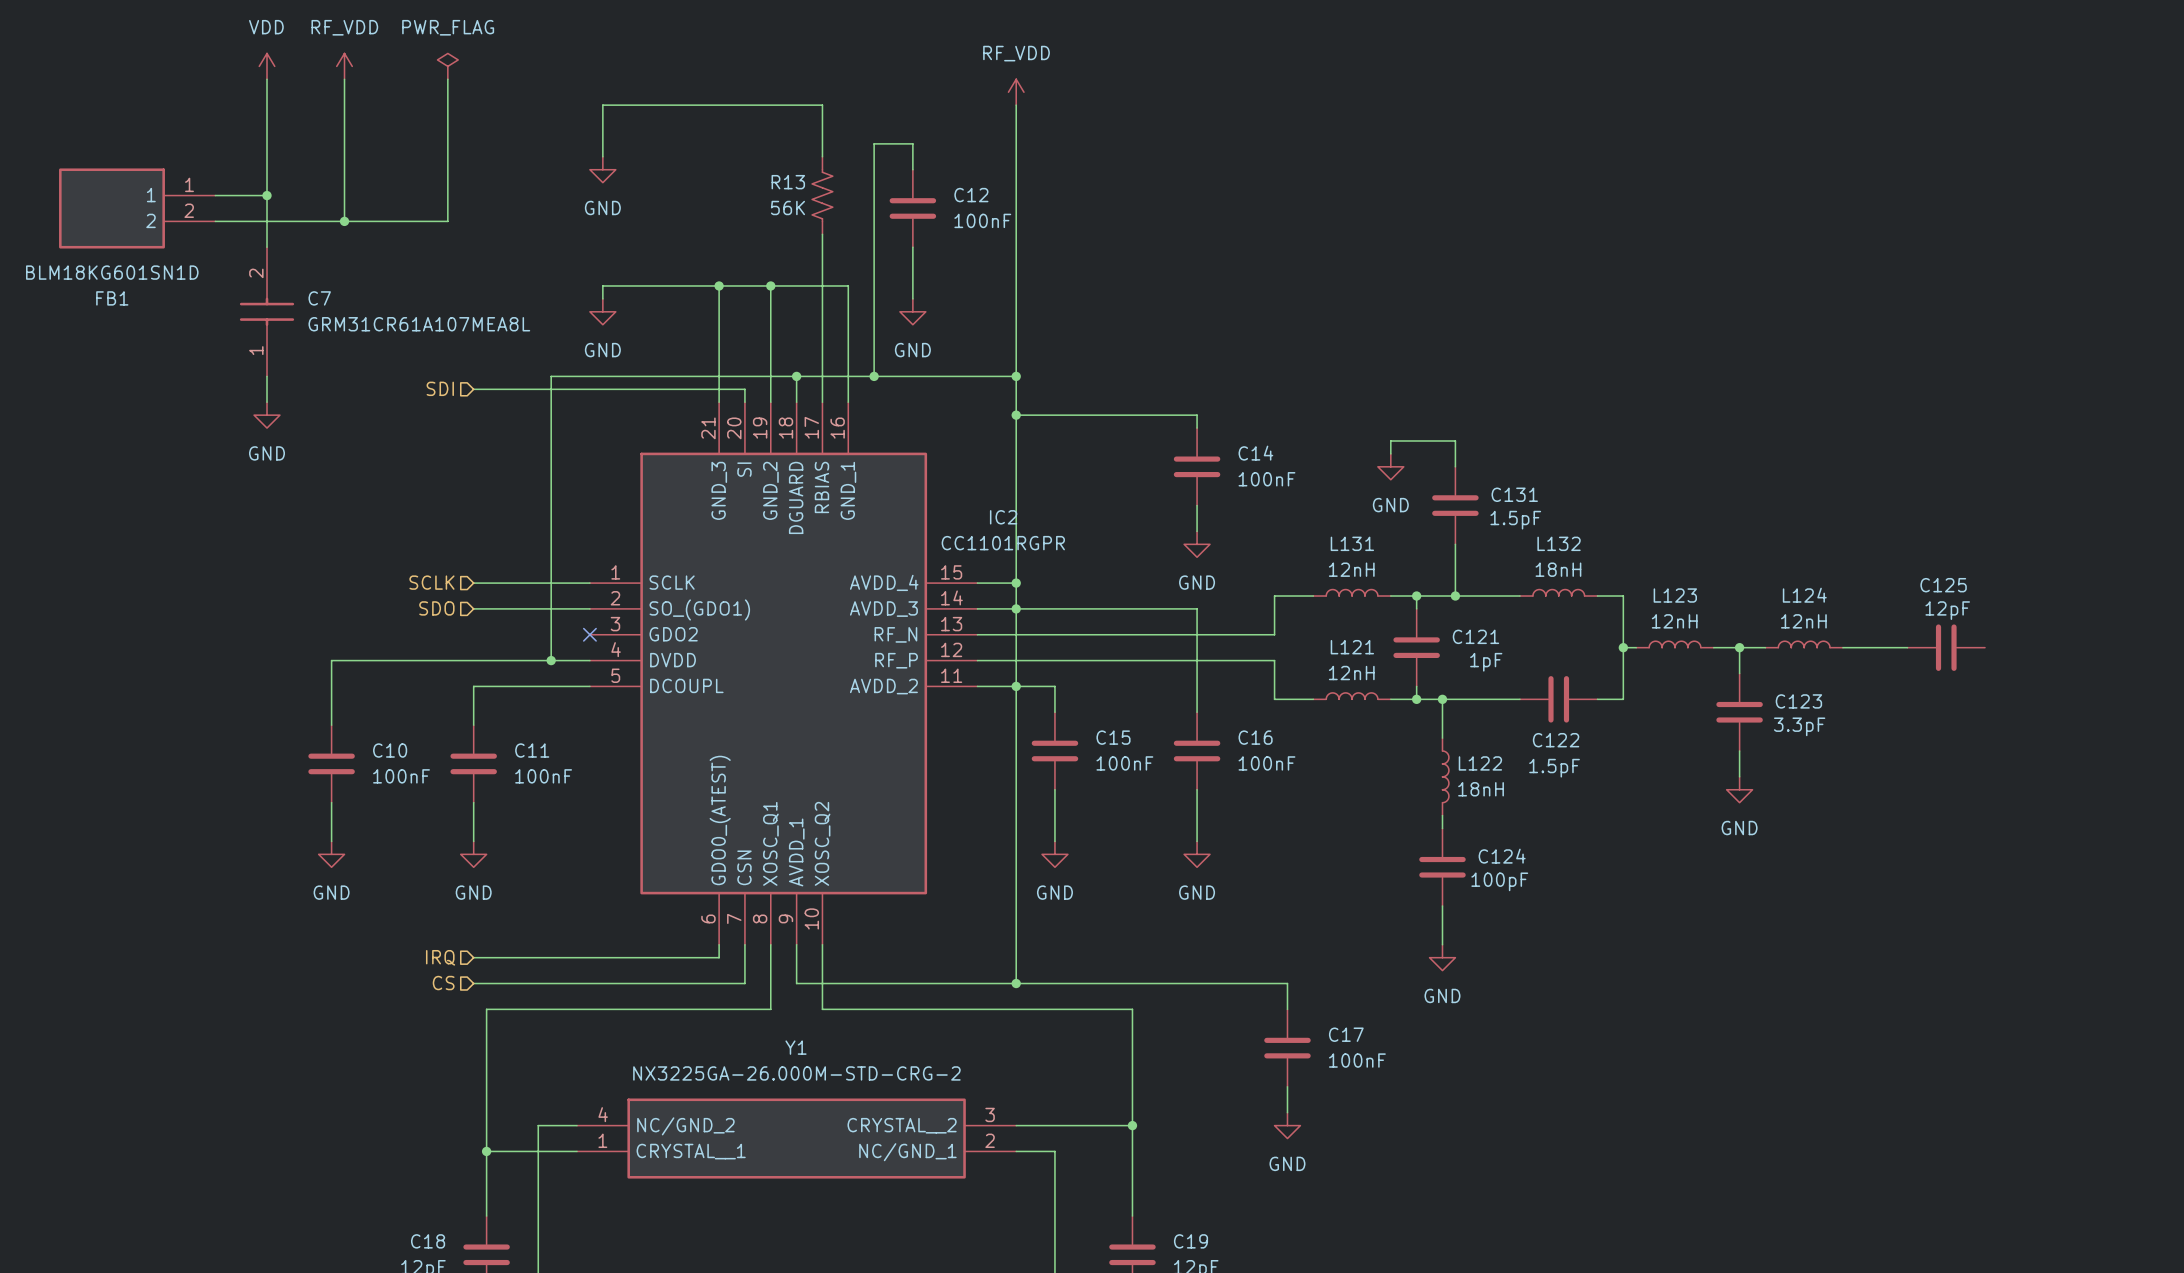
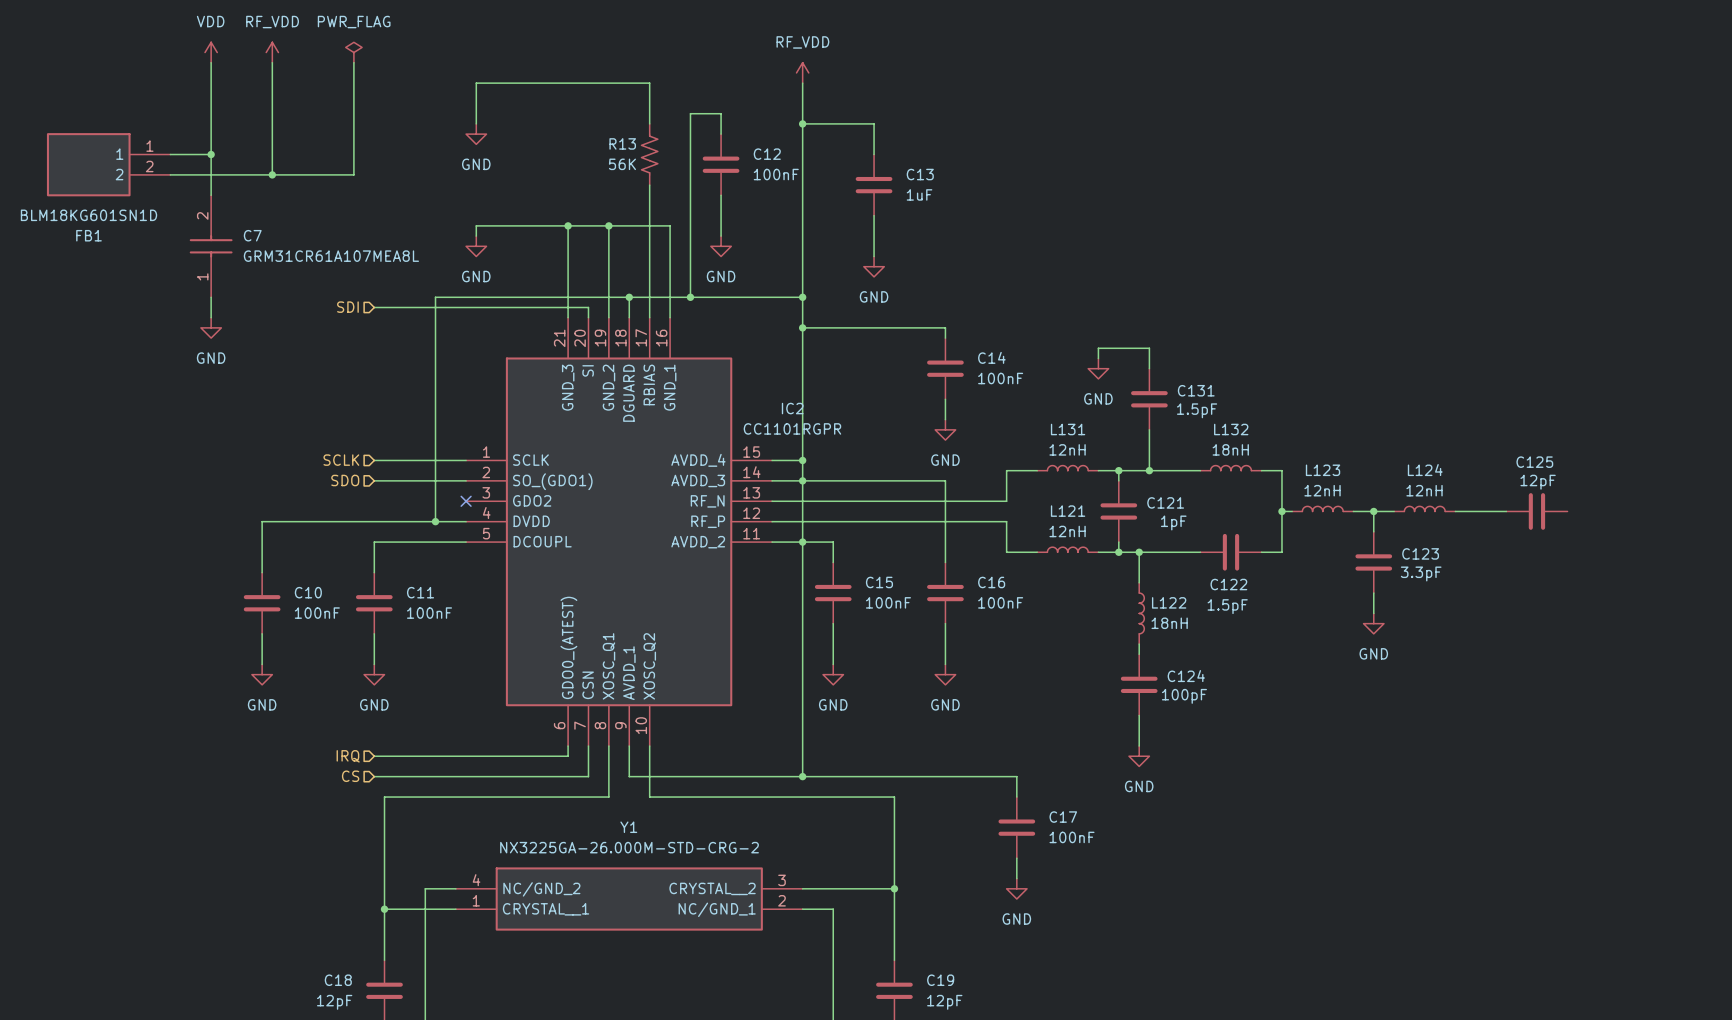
wire: none -> (802, 123) (874, 123) (874, 154)
junction: none -> (802, 123)
C13: none -> 1uF (874, 185)
wire: none -> (874, 215) (874, 256)
power symbol: none -> GND (874, 266)

